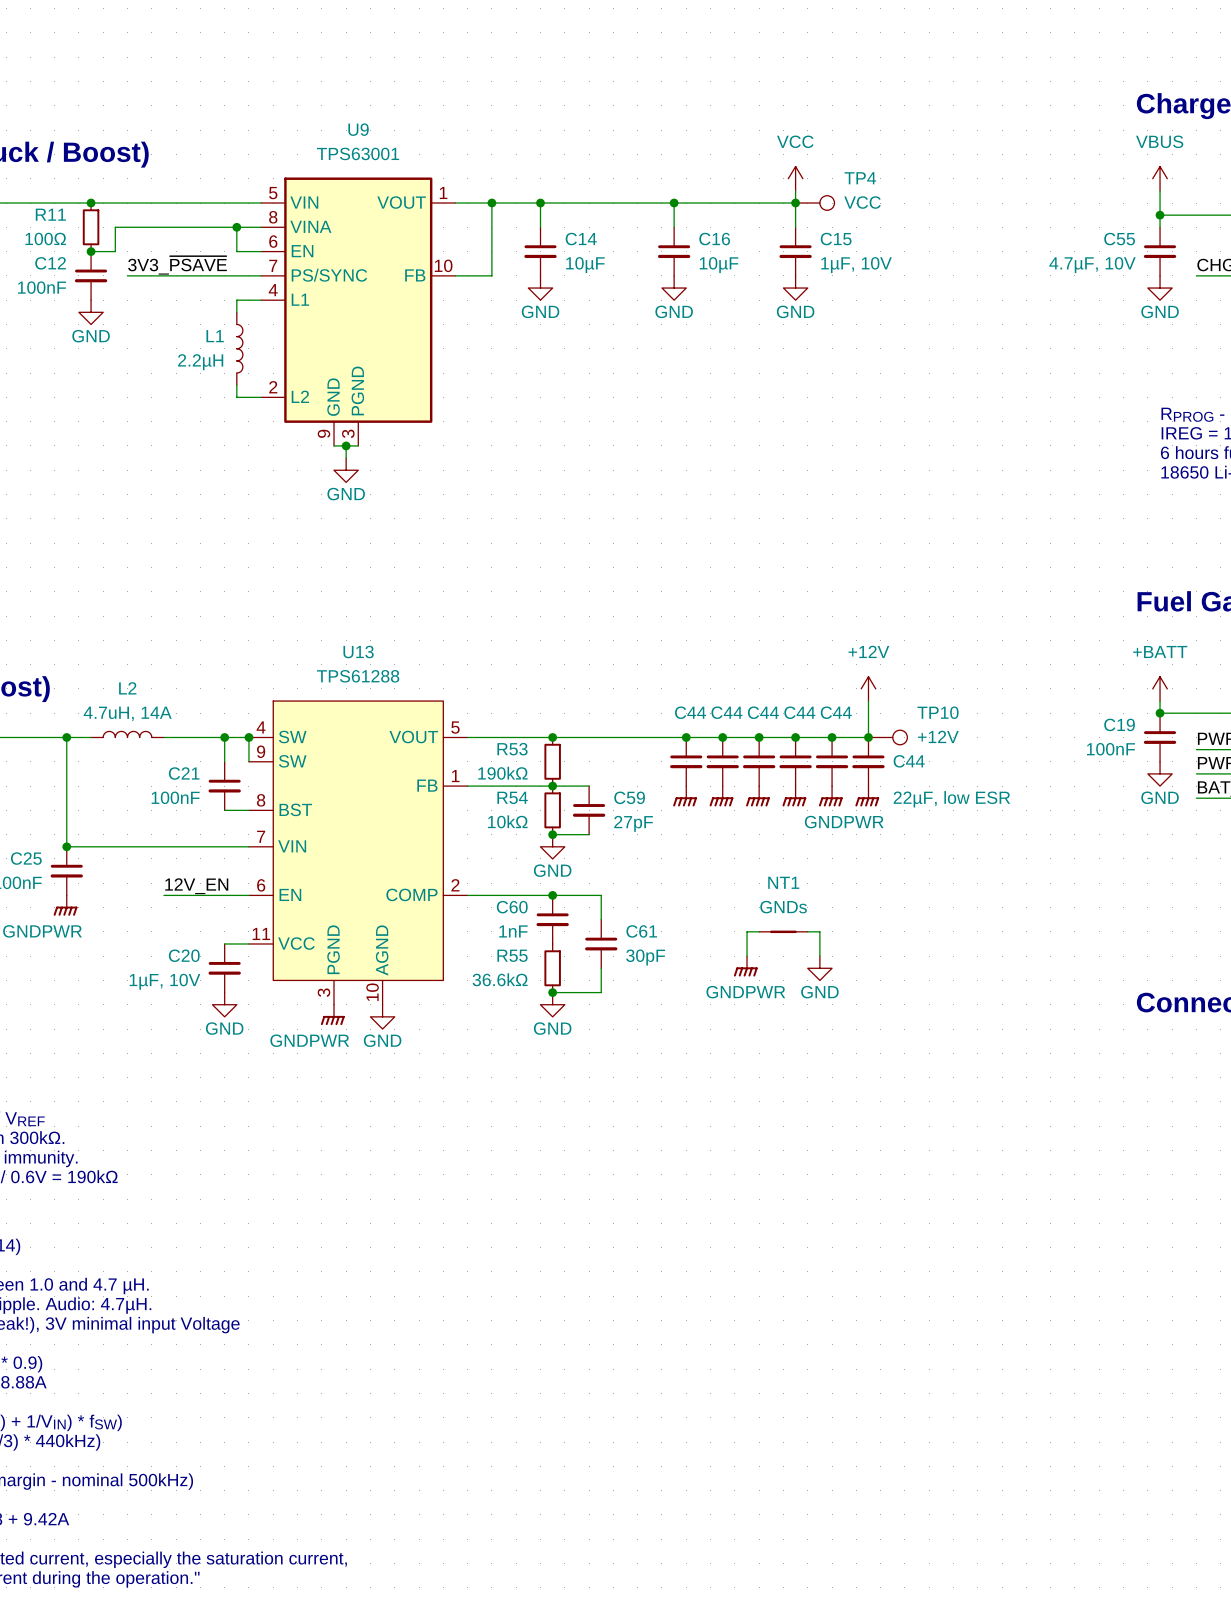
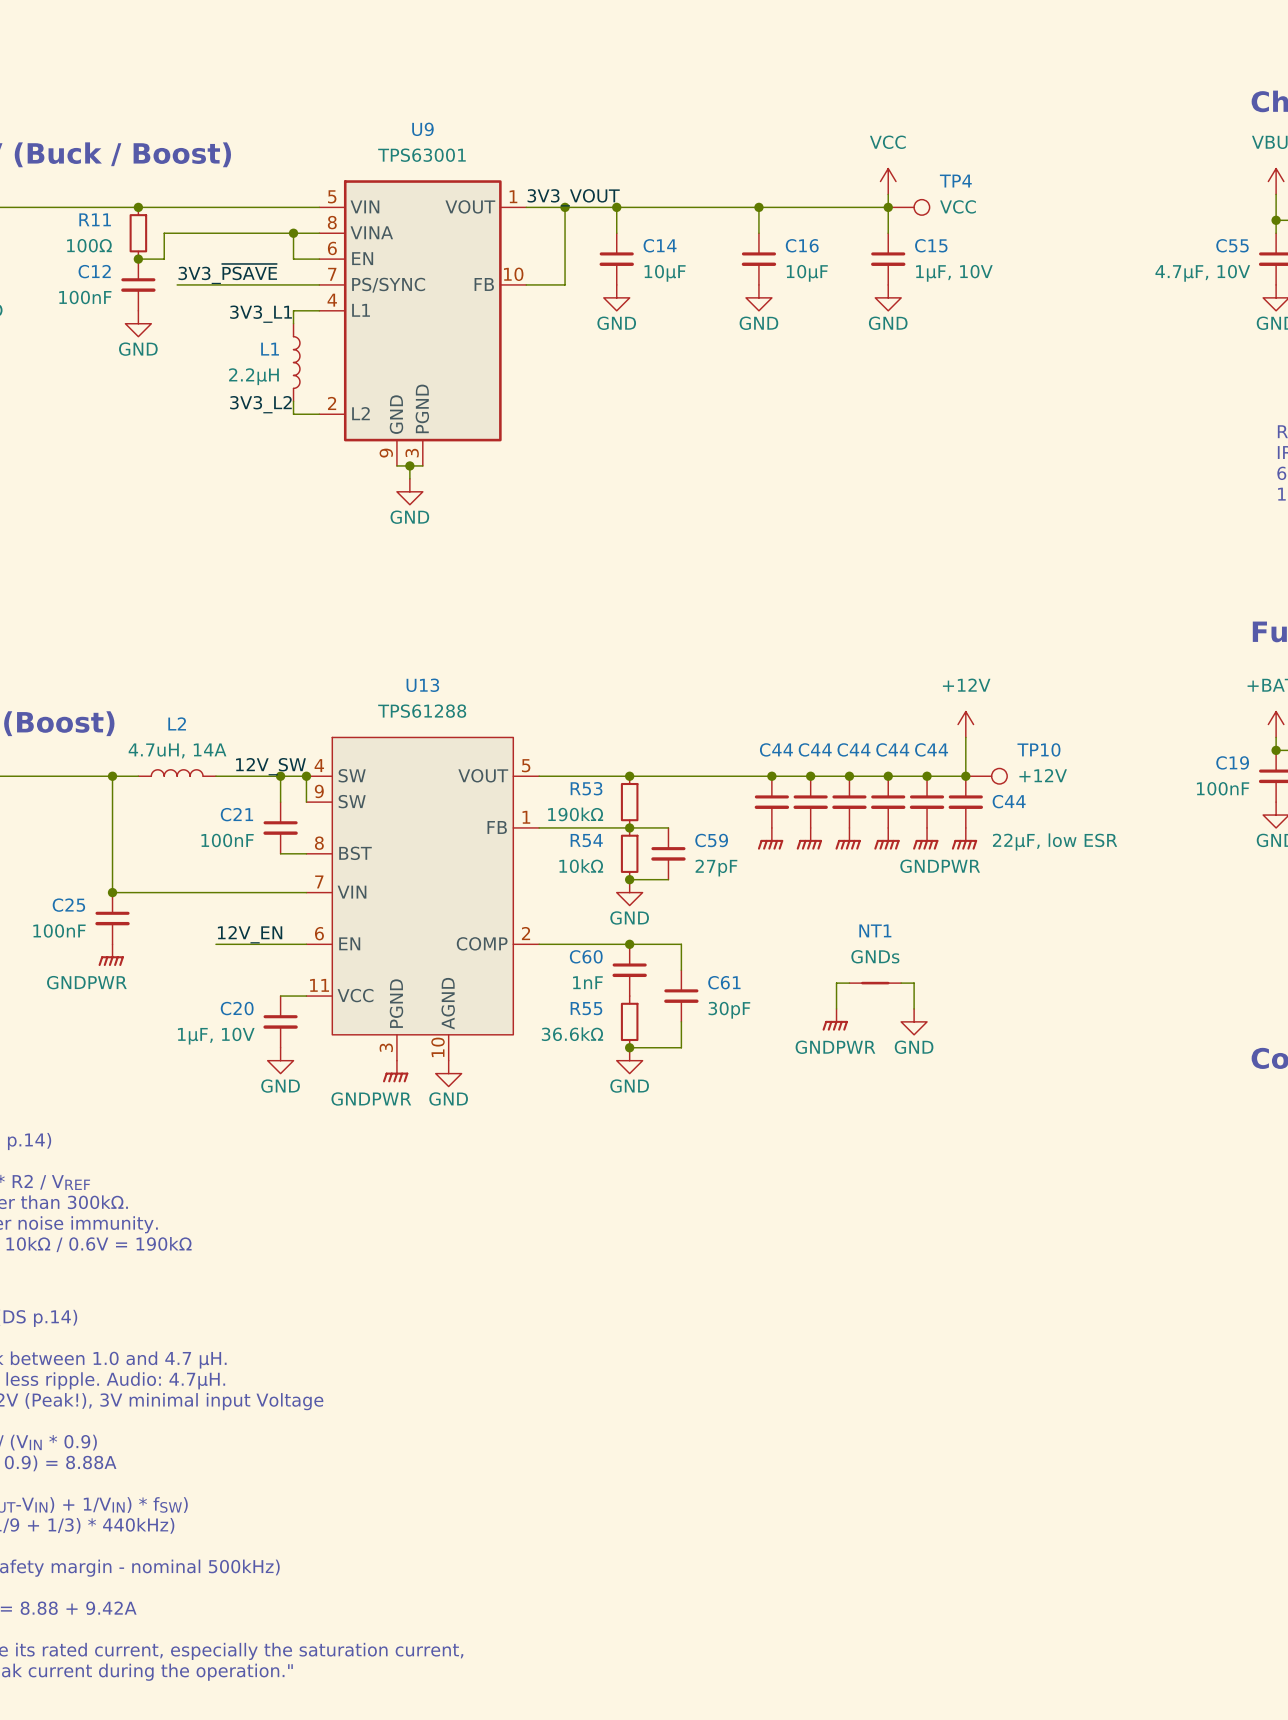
label: none -> 3V3_VOUT (573, 197)
label: none -> 3V3_L1 (261, 314)
label: none -> 3V3_L2 (260, 404)
label: none -> 12V_SW (270, 766)

